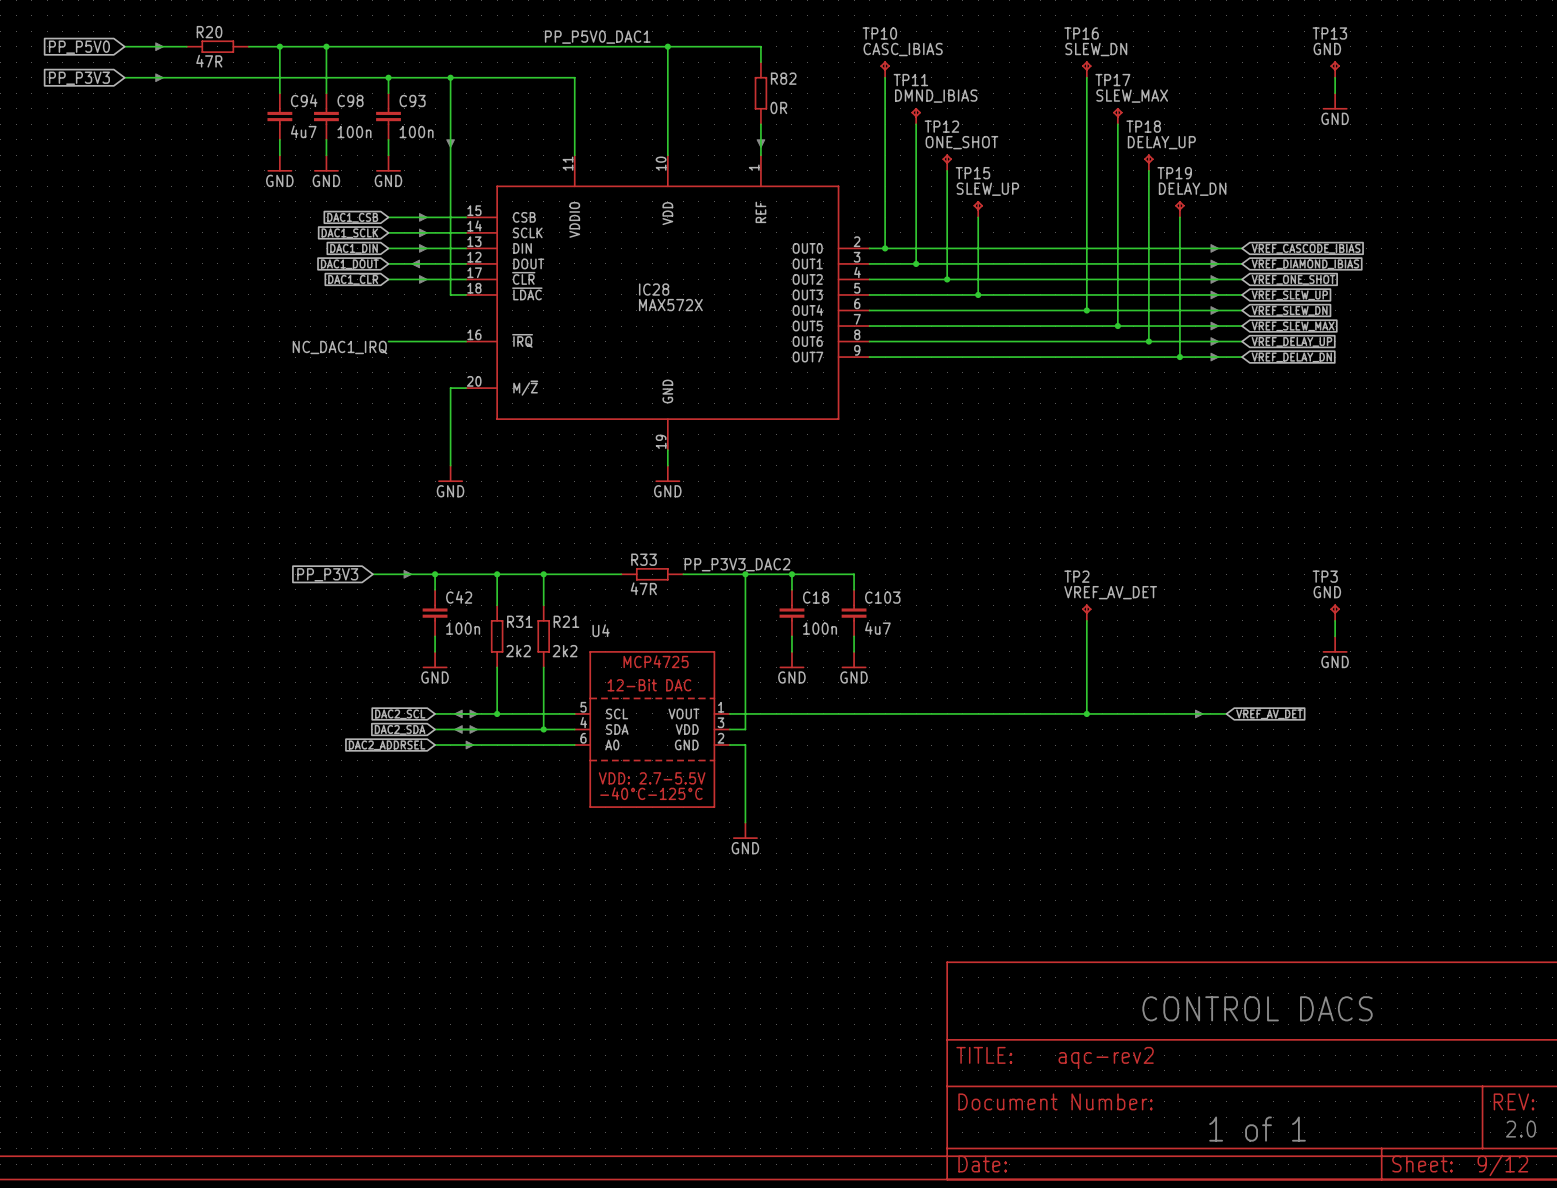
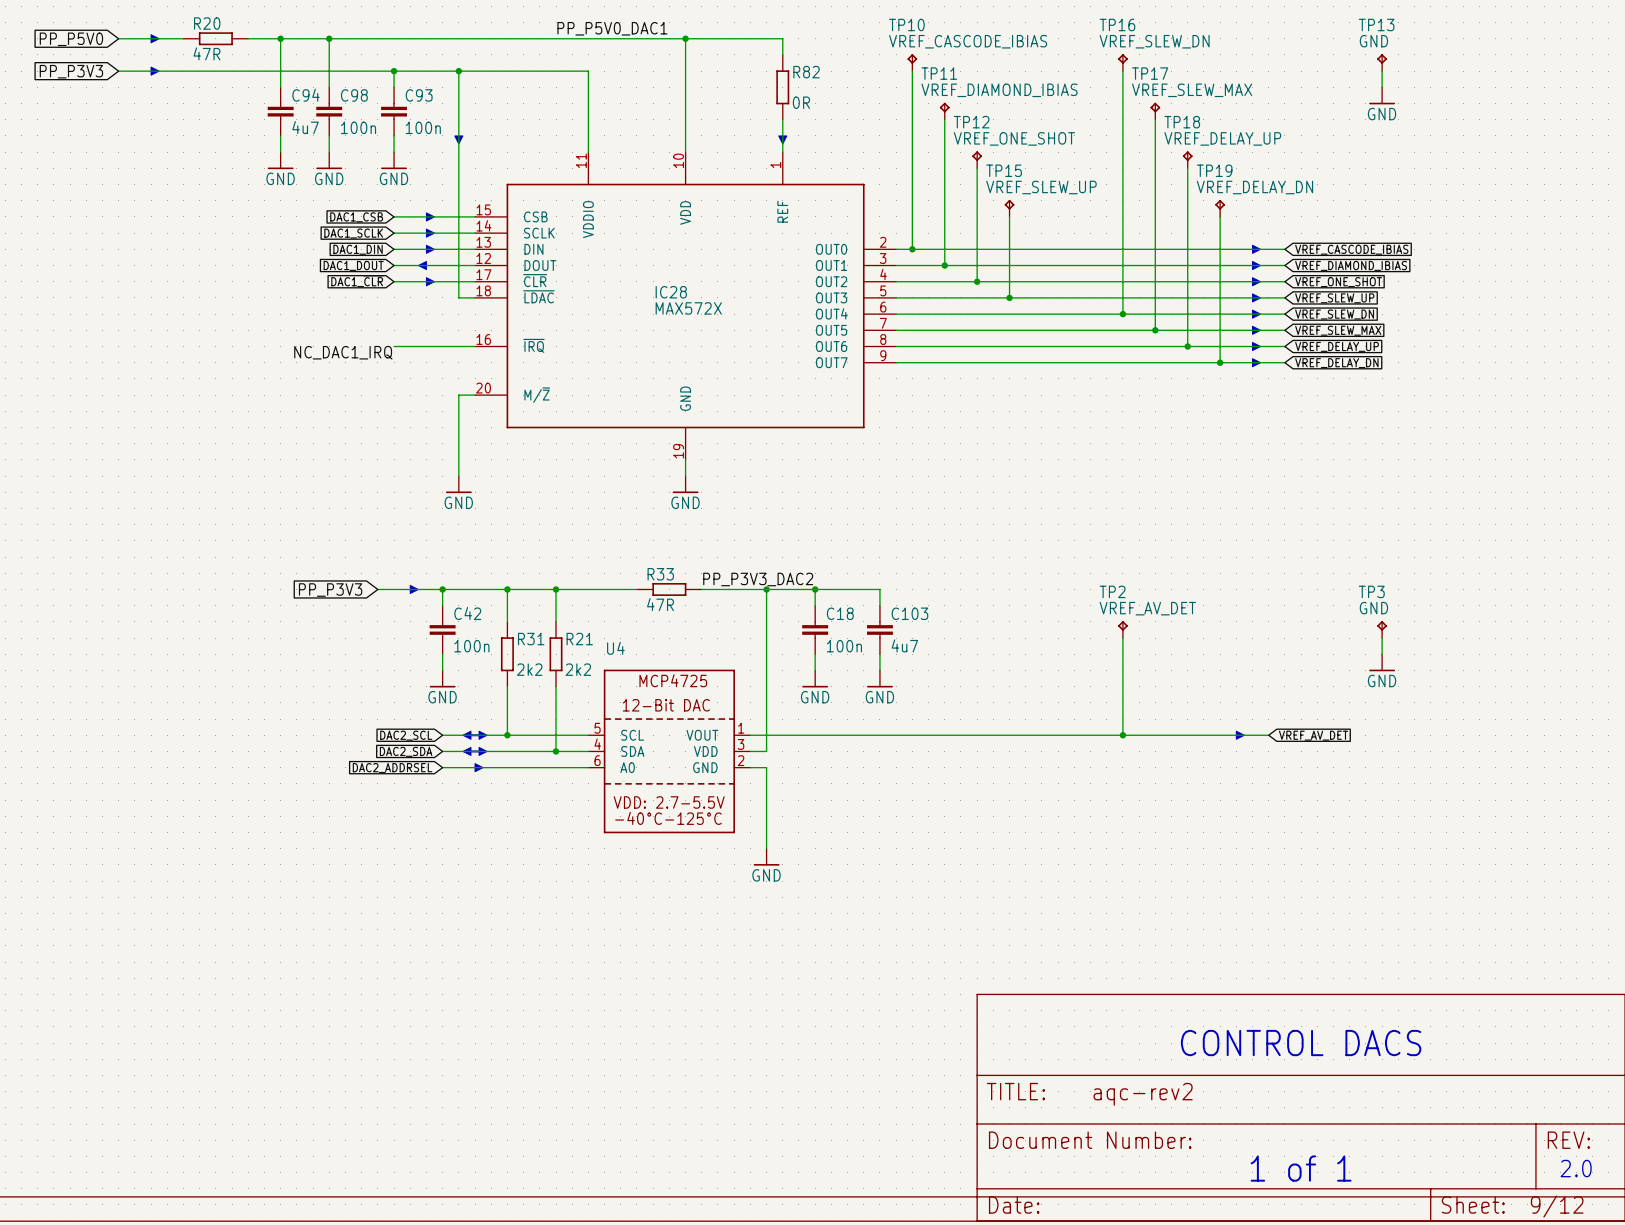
TP10 value: CASC_IBIAS (903, 49) -> VREF_CASCODE_IBIAS (968, 41)
TP16 value: SLEW_DN (1096, 49) -> VREF_SLEW_DN (1154, 41)
TP11 value: DMND_IBIAS (936, 96) -> VREF_DIAMOND_IBIAS (999, 90)
TP17 value: SLEW_MAX (1132, 96) -> VREF_SLEW_MAX (1192, 90)
TP12 value: ONE_SHOT (961, 142) -> VREF_ONE_SHOT (1014, 138)
TP18 value: DELAY_UP (1161, 142) -> VREF_DELAY_UP (1222, 138)
TP15 value: SLEW_UP (987, 189) -> VREF_SLEW_UP (1041, 187)
TP19 value: DELAY_DN (1192, 189) -> VREF_DELAY_DN (1254, 187)

